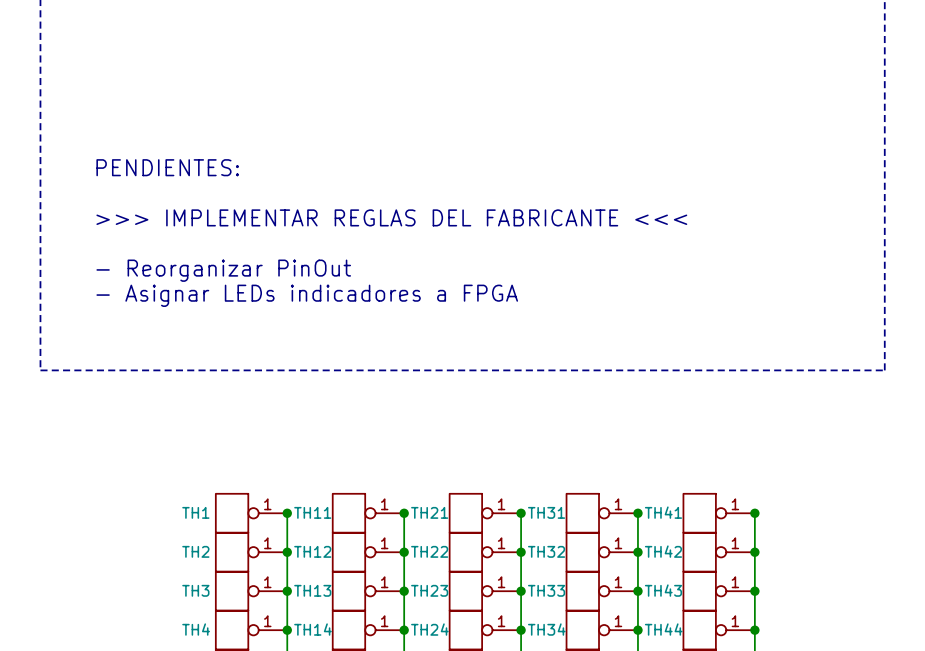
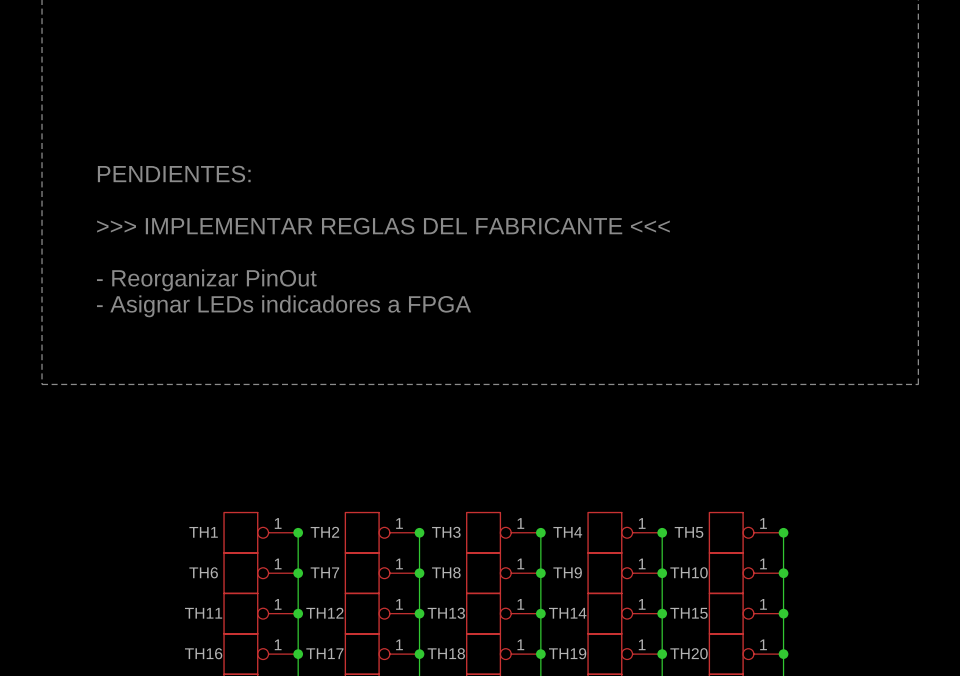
TH11 name: TH11 (312, 512) -> TH2 (324, 532)
TH21 name: TH21 (429, 512) -> TH3 (446, 532)
TH31 name: TH31 (546, 512) -> TH4 (567, 532)
TH41 name: TH41 (663, 512) -> TH5 (689, 532)
TH2 name: TH2 (195, 551) -> TH6 (203, 572)
TH12 name: TH12 (312, 551) -> TH7 (324, 572)
TH22 name: TH22 (429, 551) -> TH8 (446, 572)
TH32 name: TH32 (546, 551) -> TH9 (567, 572)
TH42 name: TH42 (663, 551) -> TH10 (689, 572)
TH3 name: TH3 (195, 590) -> TH11 (203, 613)
TH13 name: TH13 (312, 590) -> TH12 (324, 613)
TH23 name: TH23 (429, 590) -> TH13 (446, 613)
TH33 name: TH33 (546, 590) -> TH14 (567, 613)
TH43 name: TH43 (663, 590) -> TH15 (689, 613)
TH4 name: TH4 (196, 629) -> TH16 (203, 653)
TH14 name: TH14 (312, 629) -> TH17 (324, 653)
TH24 name: TH24 (429, 629) -> TH18 (446, 653)
TH34 name: TH34 (546, 629) -> TH19 (567, 653)
TH44 name: TH44 (663, 629) -> TH20 (689, 653)

